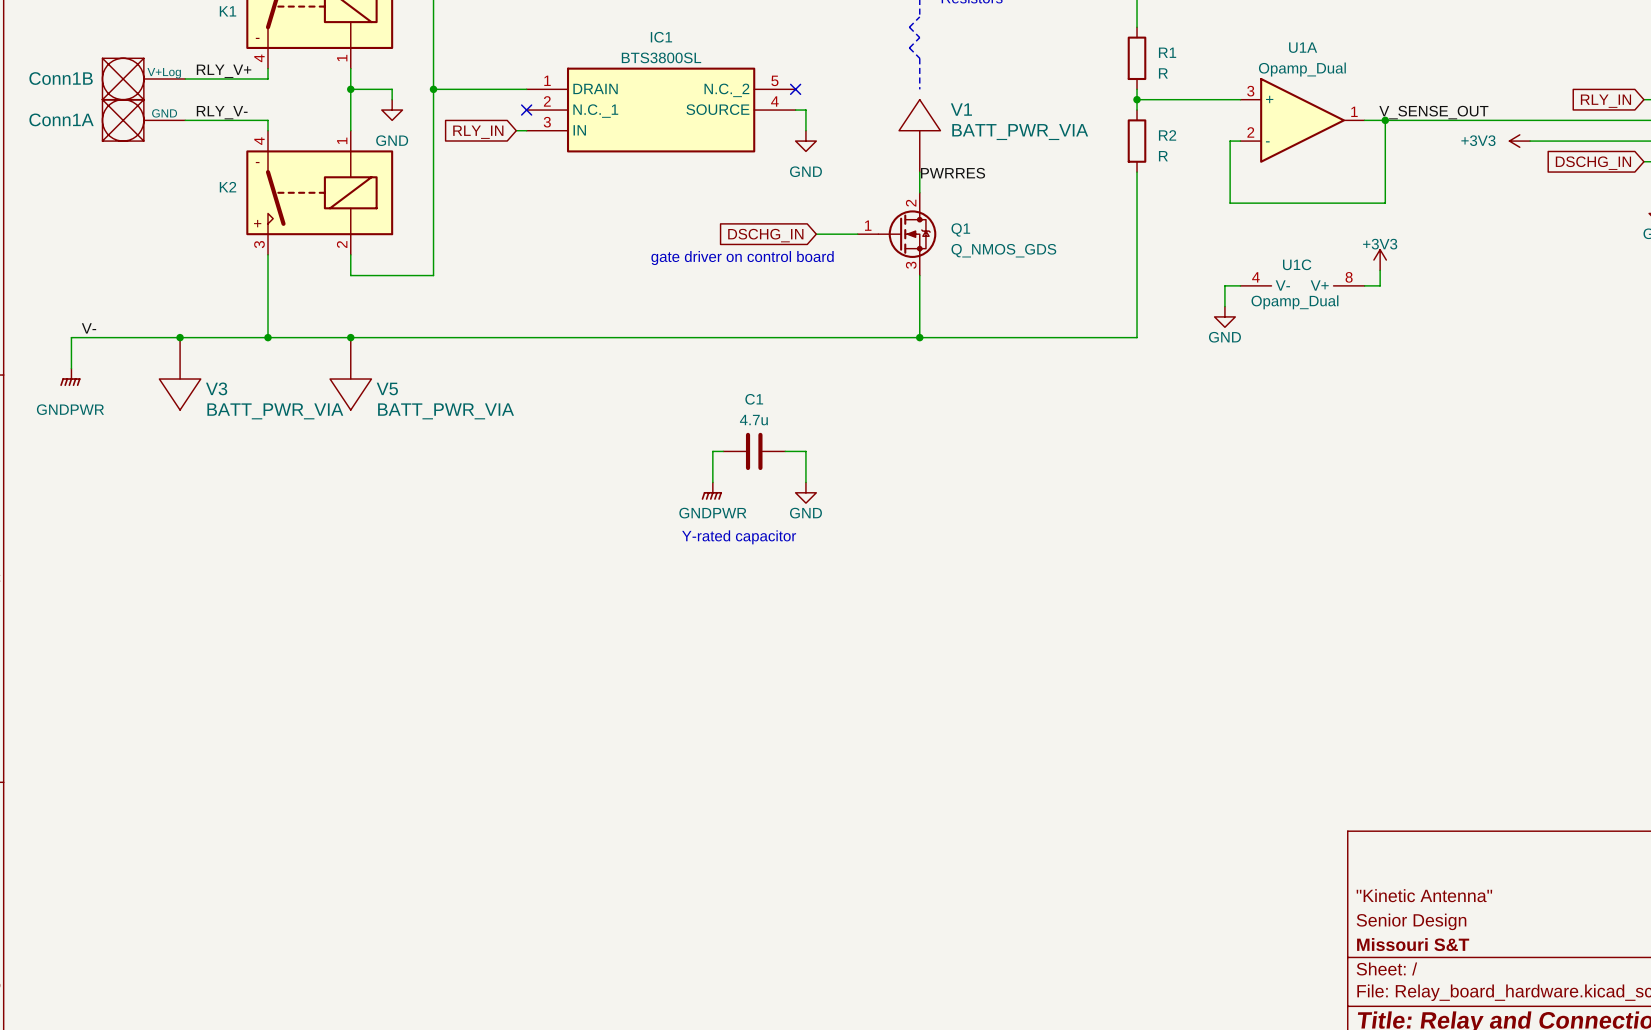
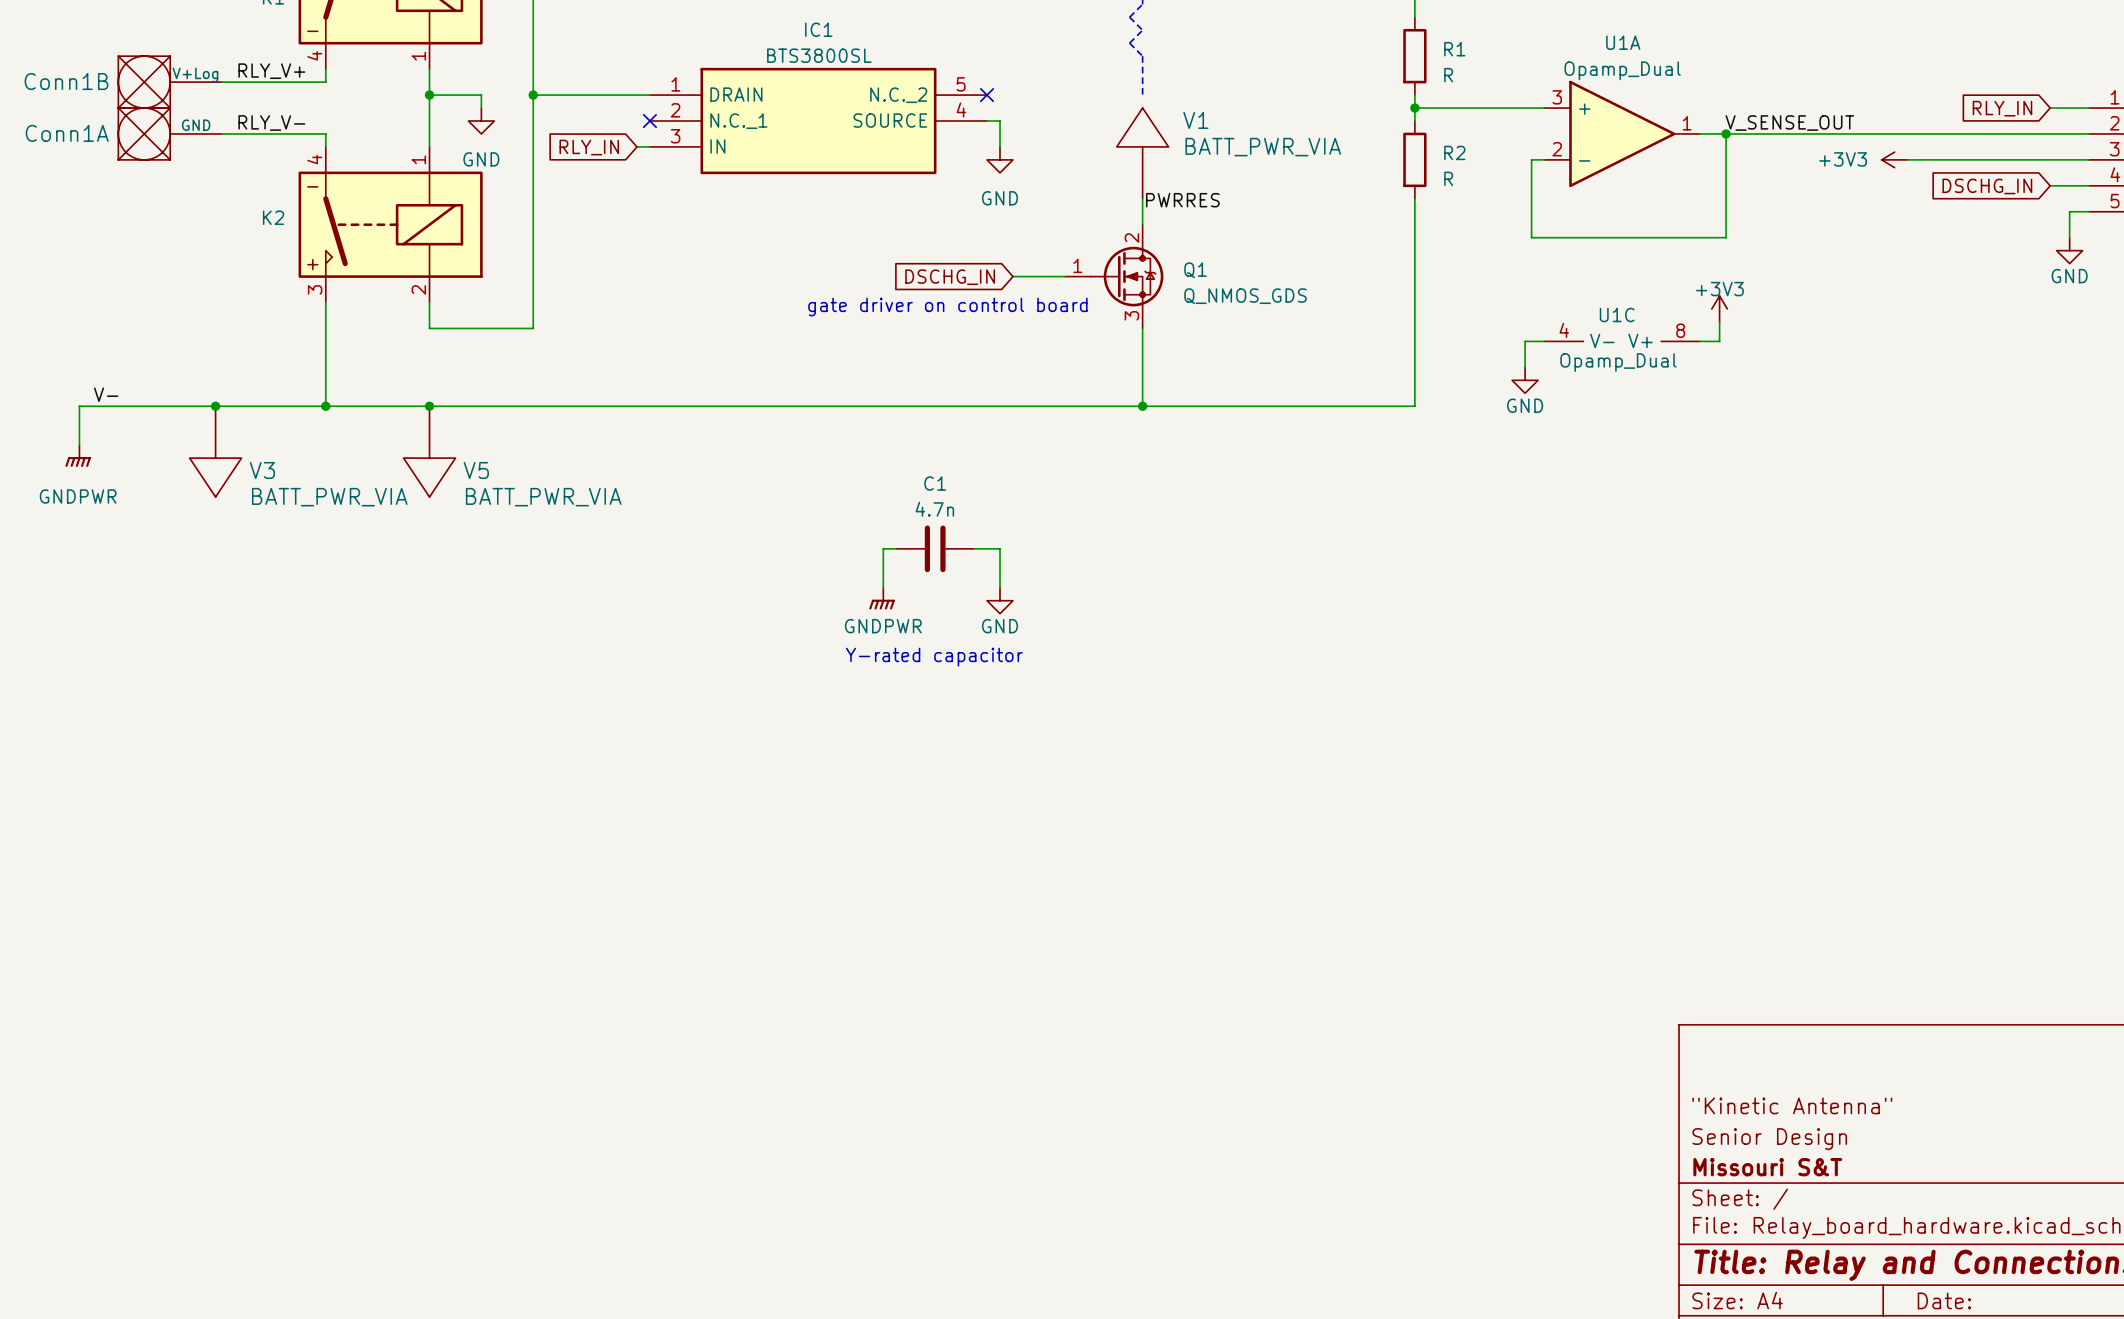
C1 value: 4.7u (753, 420) -> 4.7n (934, 509)

